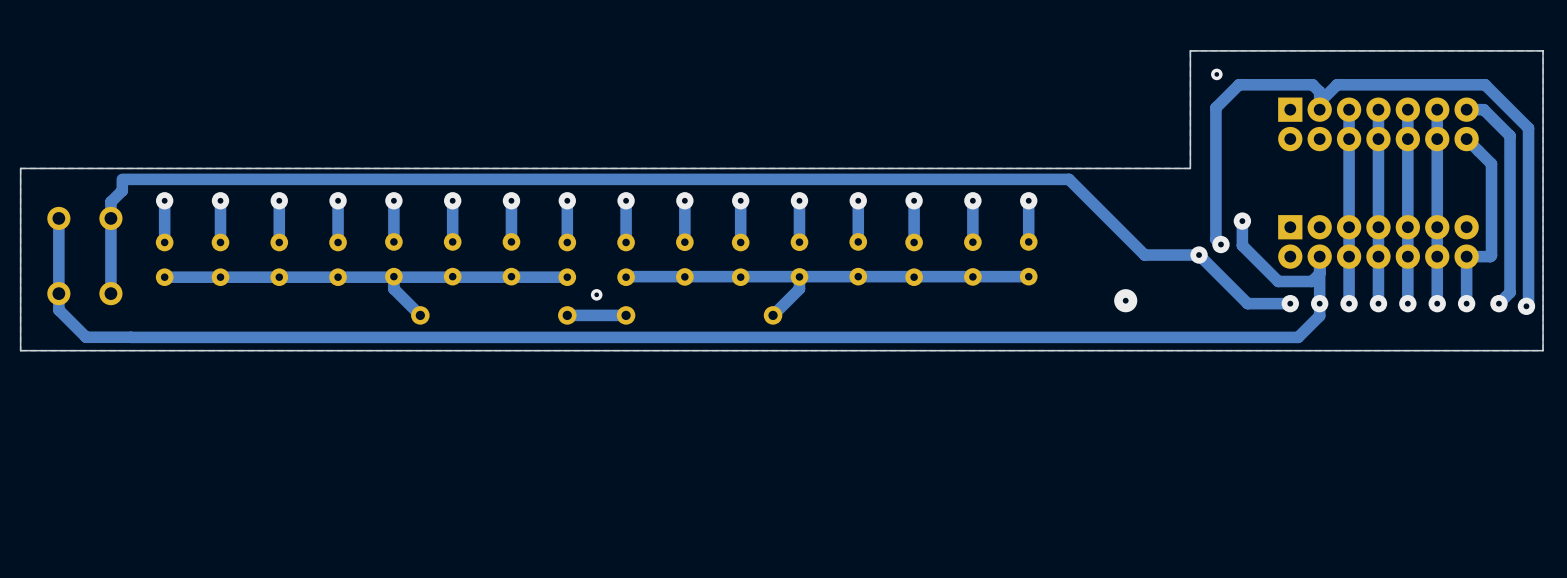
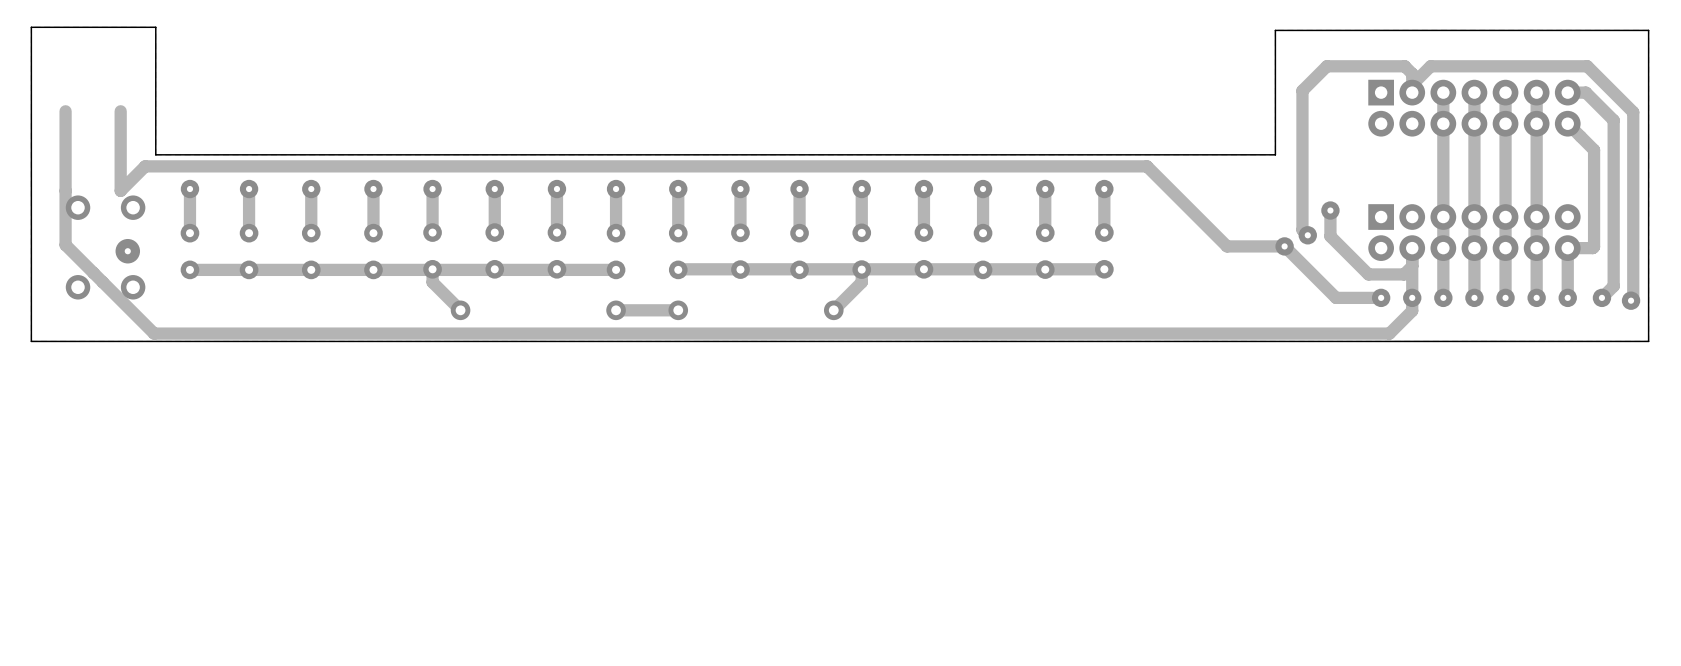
line: none -> (155, 27) (31, 27) (31, 341) (1648, 341) (1648, 30) (1275, 30) (1275, 154) (155, 154) (155, 27)
board edge: (1543, 50) (1543, 350) (20, 350) (20, 168) (1190, 168) (1190, 50) (1543, 50) -> none
via: (1216, 74) -> none
track: none -> (120, 111) (120, 190) (145, 166)
track: (122, 181) (122, 190) (110, 202) (110, 293) -> none
track: (58, 218) (58, 309) (86, 337) (130, 337) -> (65, 111) (65, 245) (154, 333)
via: none -> (127, 251)
via: (596, 294) -> none
via: (1125, 300) -> none

